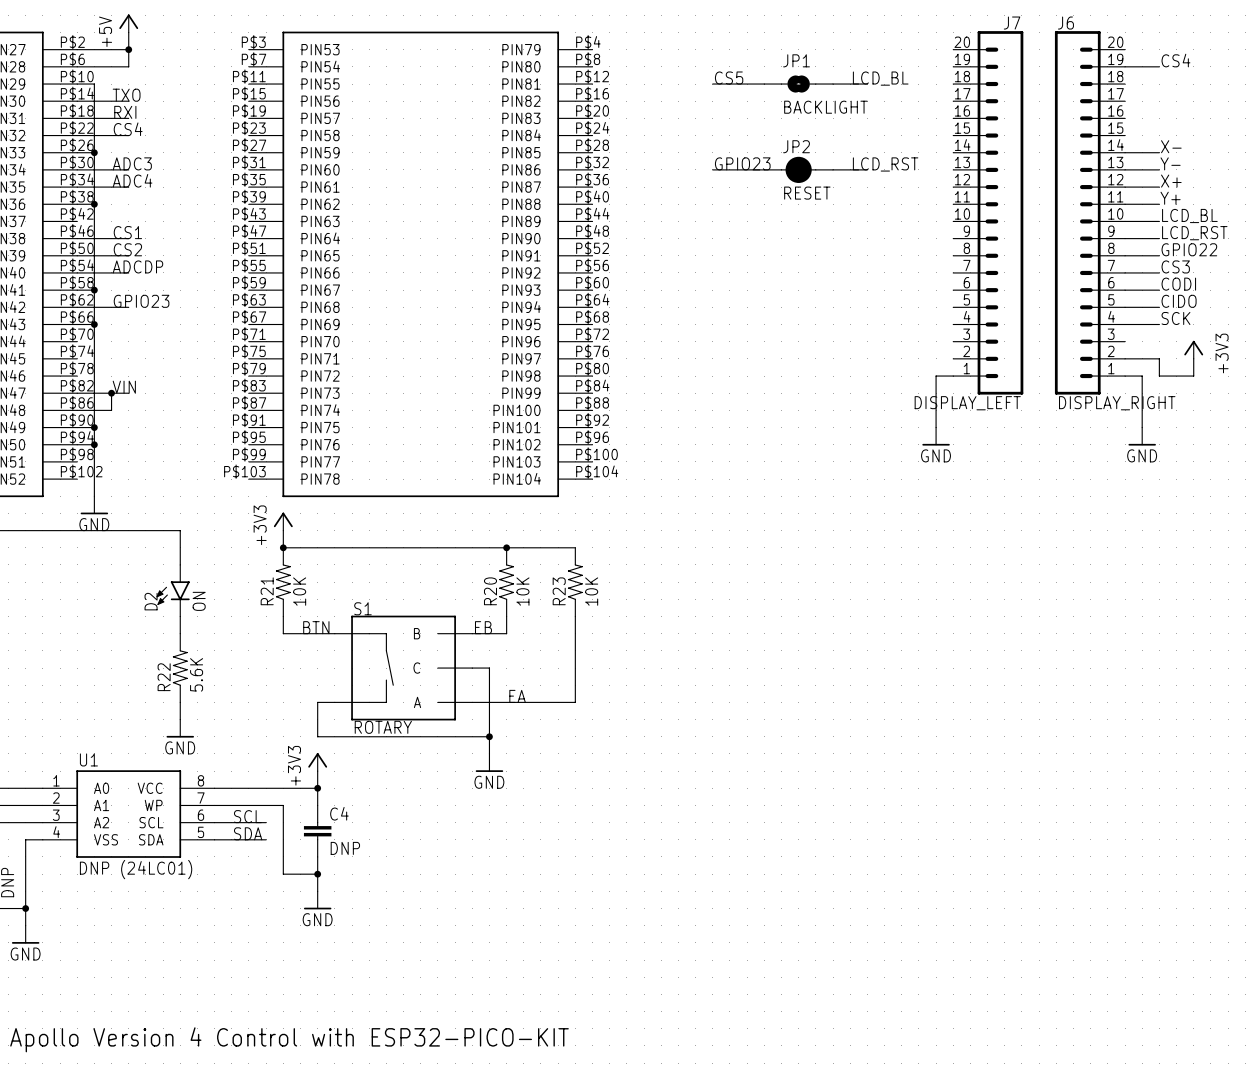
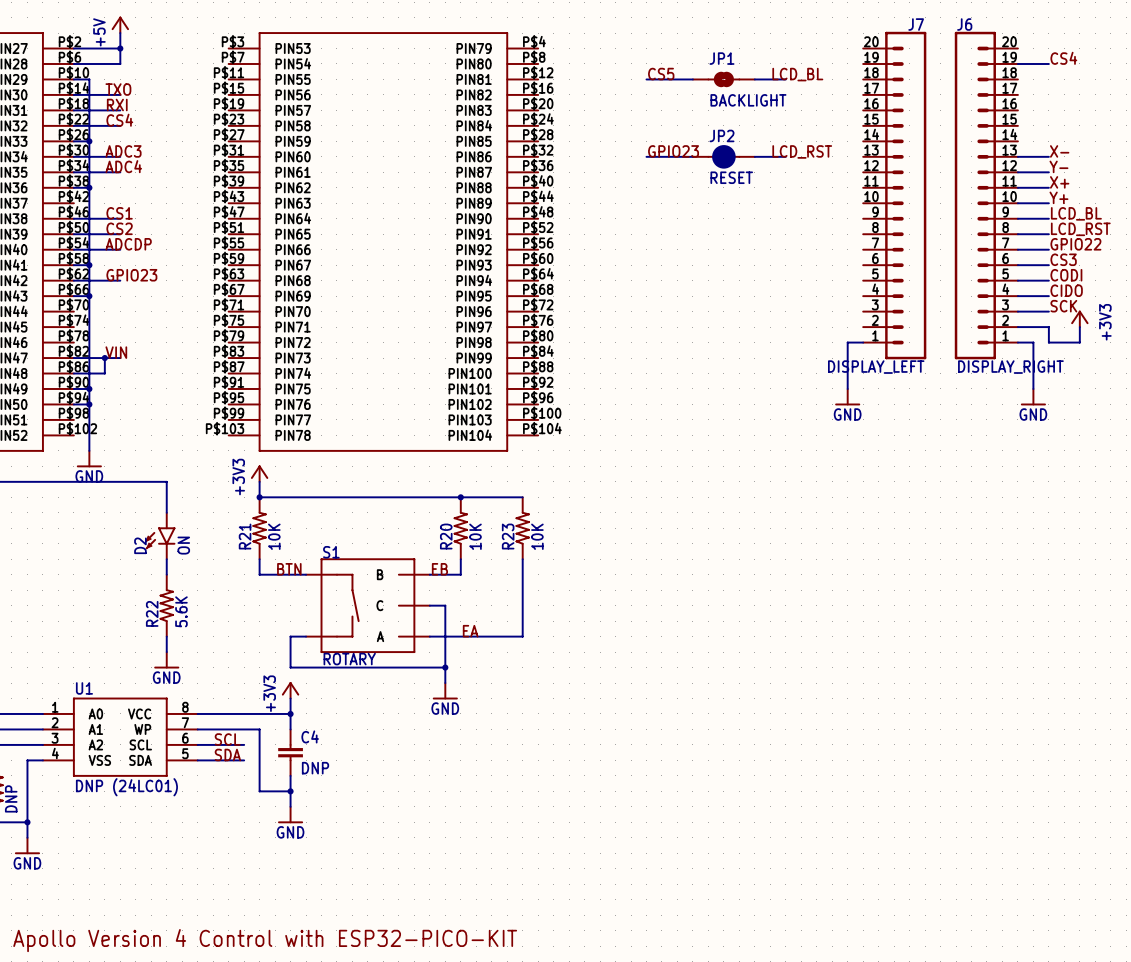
label: X- (1171, 146) -> none
wire: (1125, 152) (1159, 152) -> none
label: Y- (1170, 163) -> X- (1059, 151)
label: X+ (1171, 181) -> Y- (1058, 166)
label: Y+ (1170, 198) -> X+ (1059, 182)
label: LCD_BL (1189, 215) -> Y+ (1058, 197)
label: LCD_RST (1194, 233) -> LCD_BL (1076, 213)
label: GPIO22 (1189, 249) -> LCD_RST (1080, 229)
label: CS3 (1175, 266) -> GPIO22 (1075, 244)
label: CODI (1178, 284) -> CS3 (1063, 259)
label: CIDO (1179, 301) -> CODI (1066, 275)
label: SCK (1175, 318) -> CIDO (1066, 290)
label: none -> SCK (1063, 306)
wire: none -> (1017, 311) (1048, 311)

